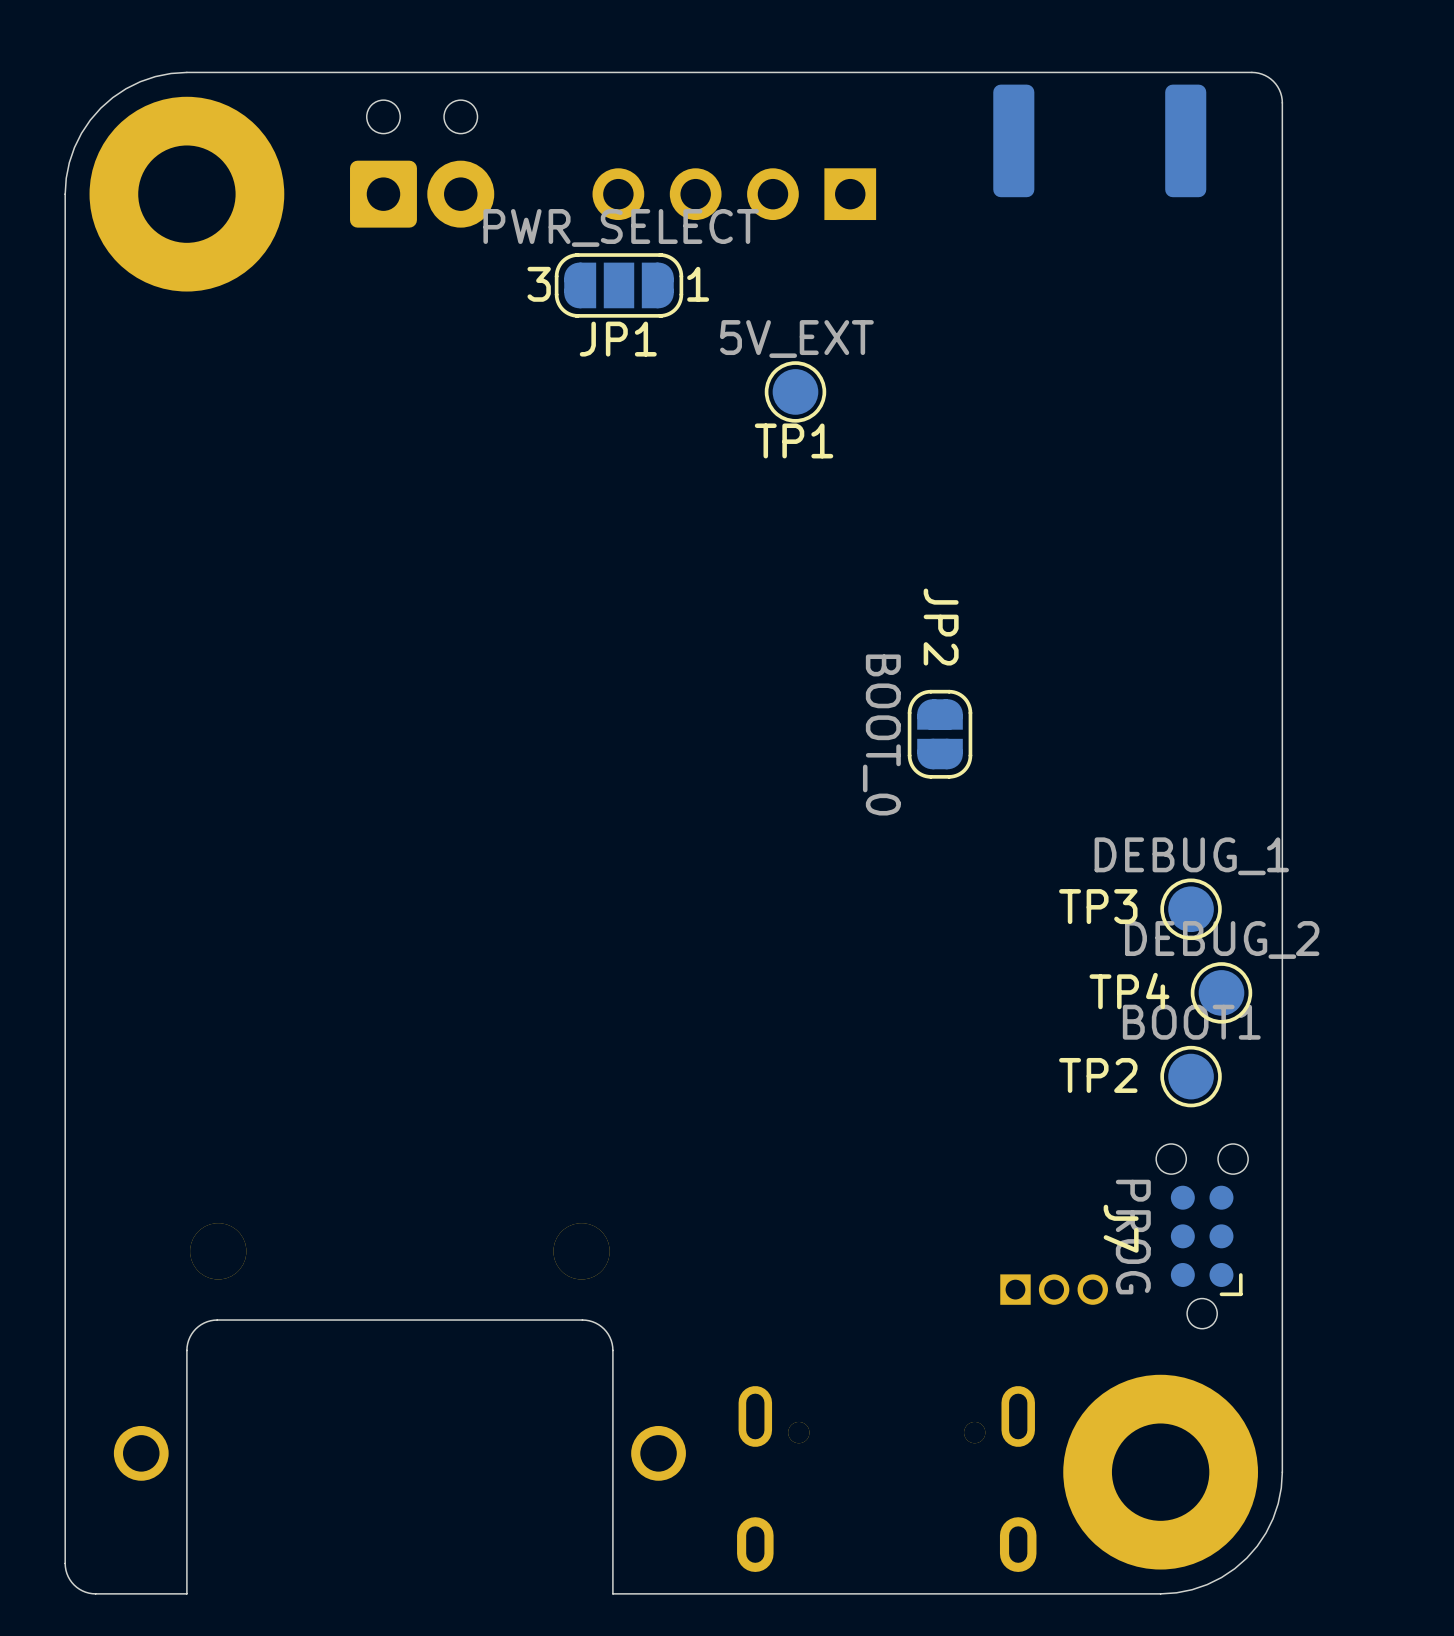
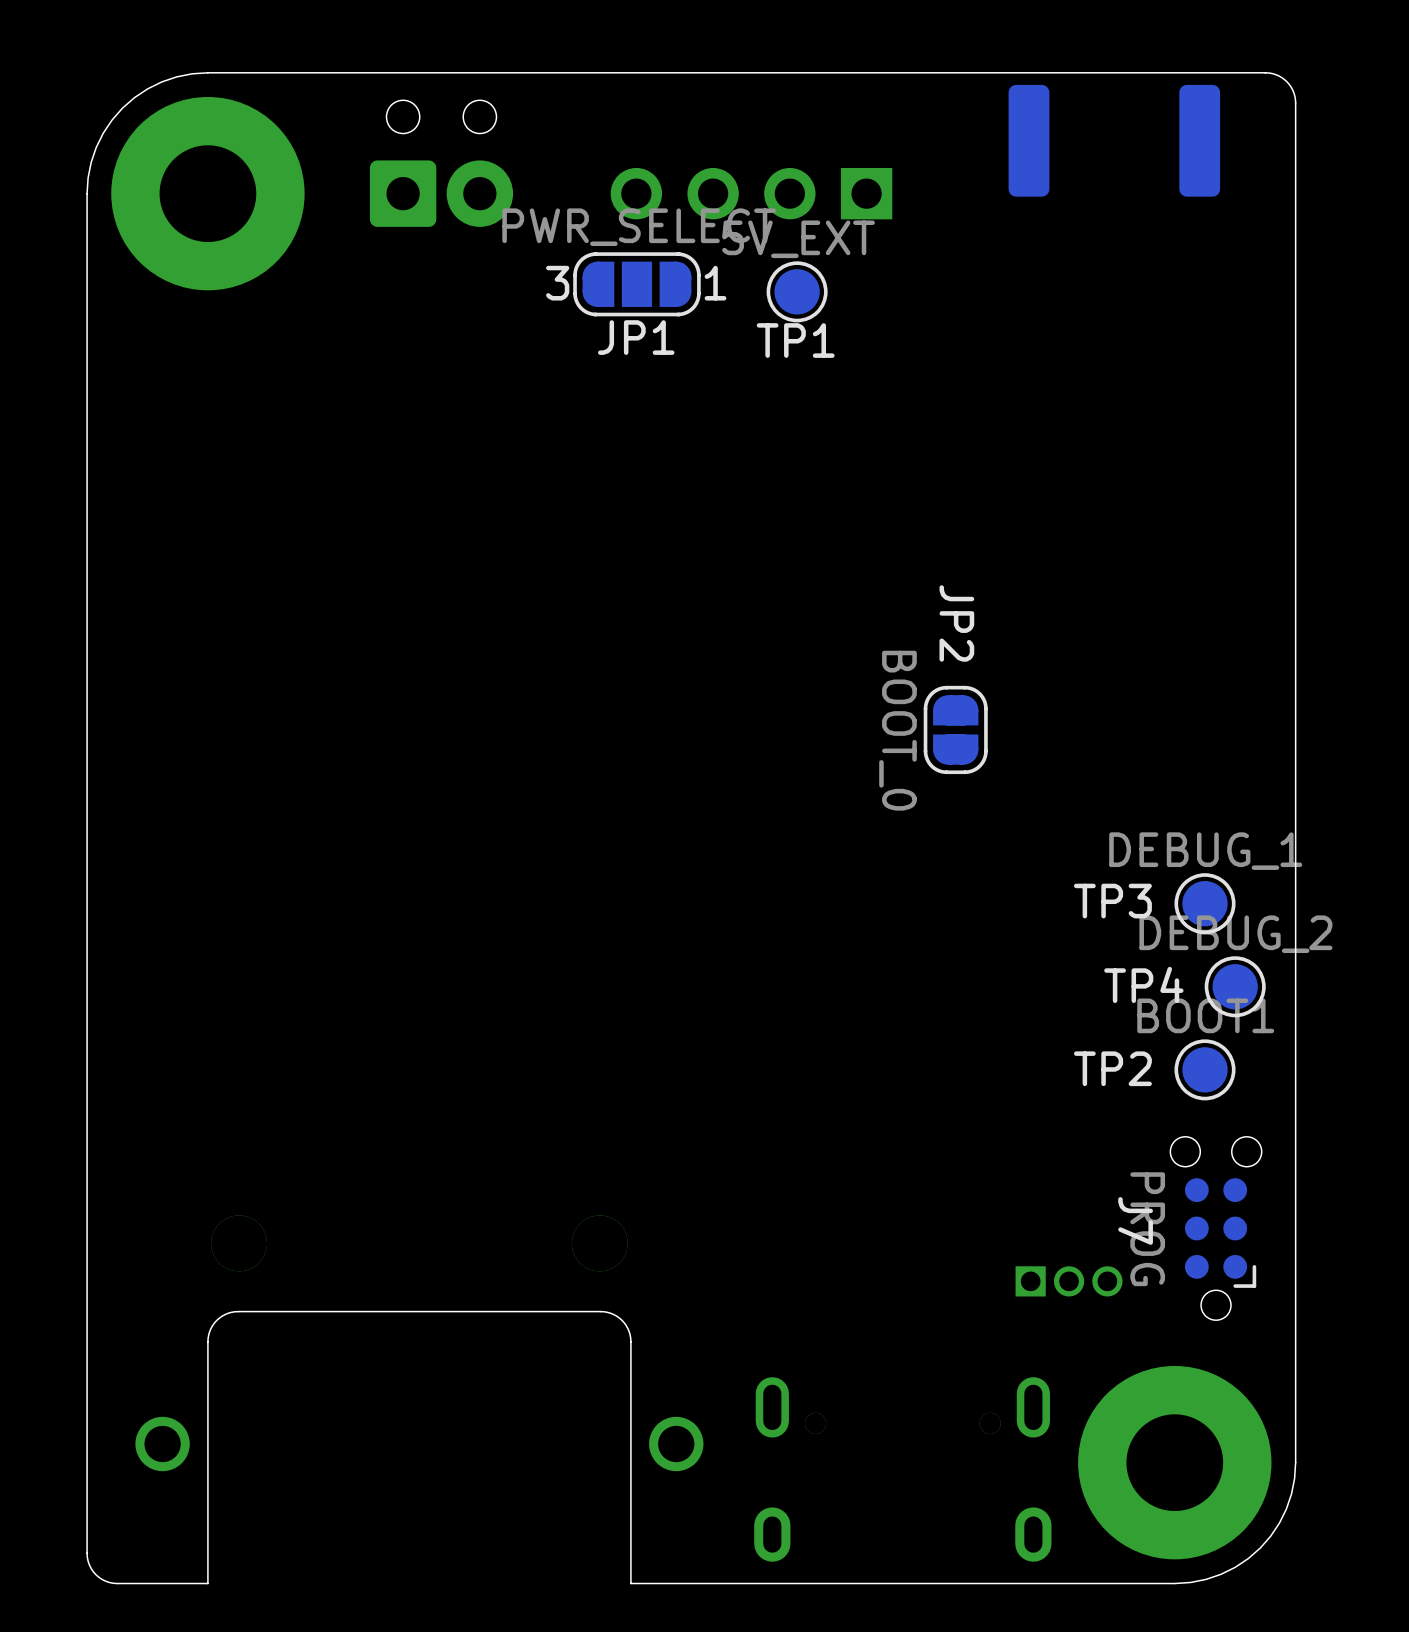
TP1 position: (795, 391) -> (797, 291)

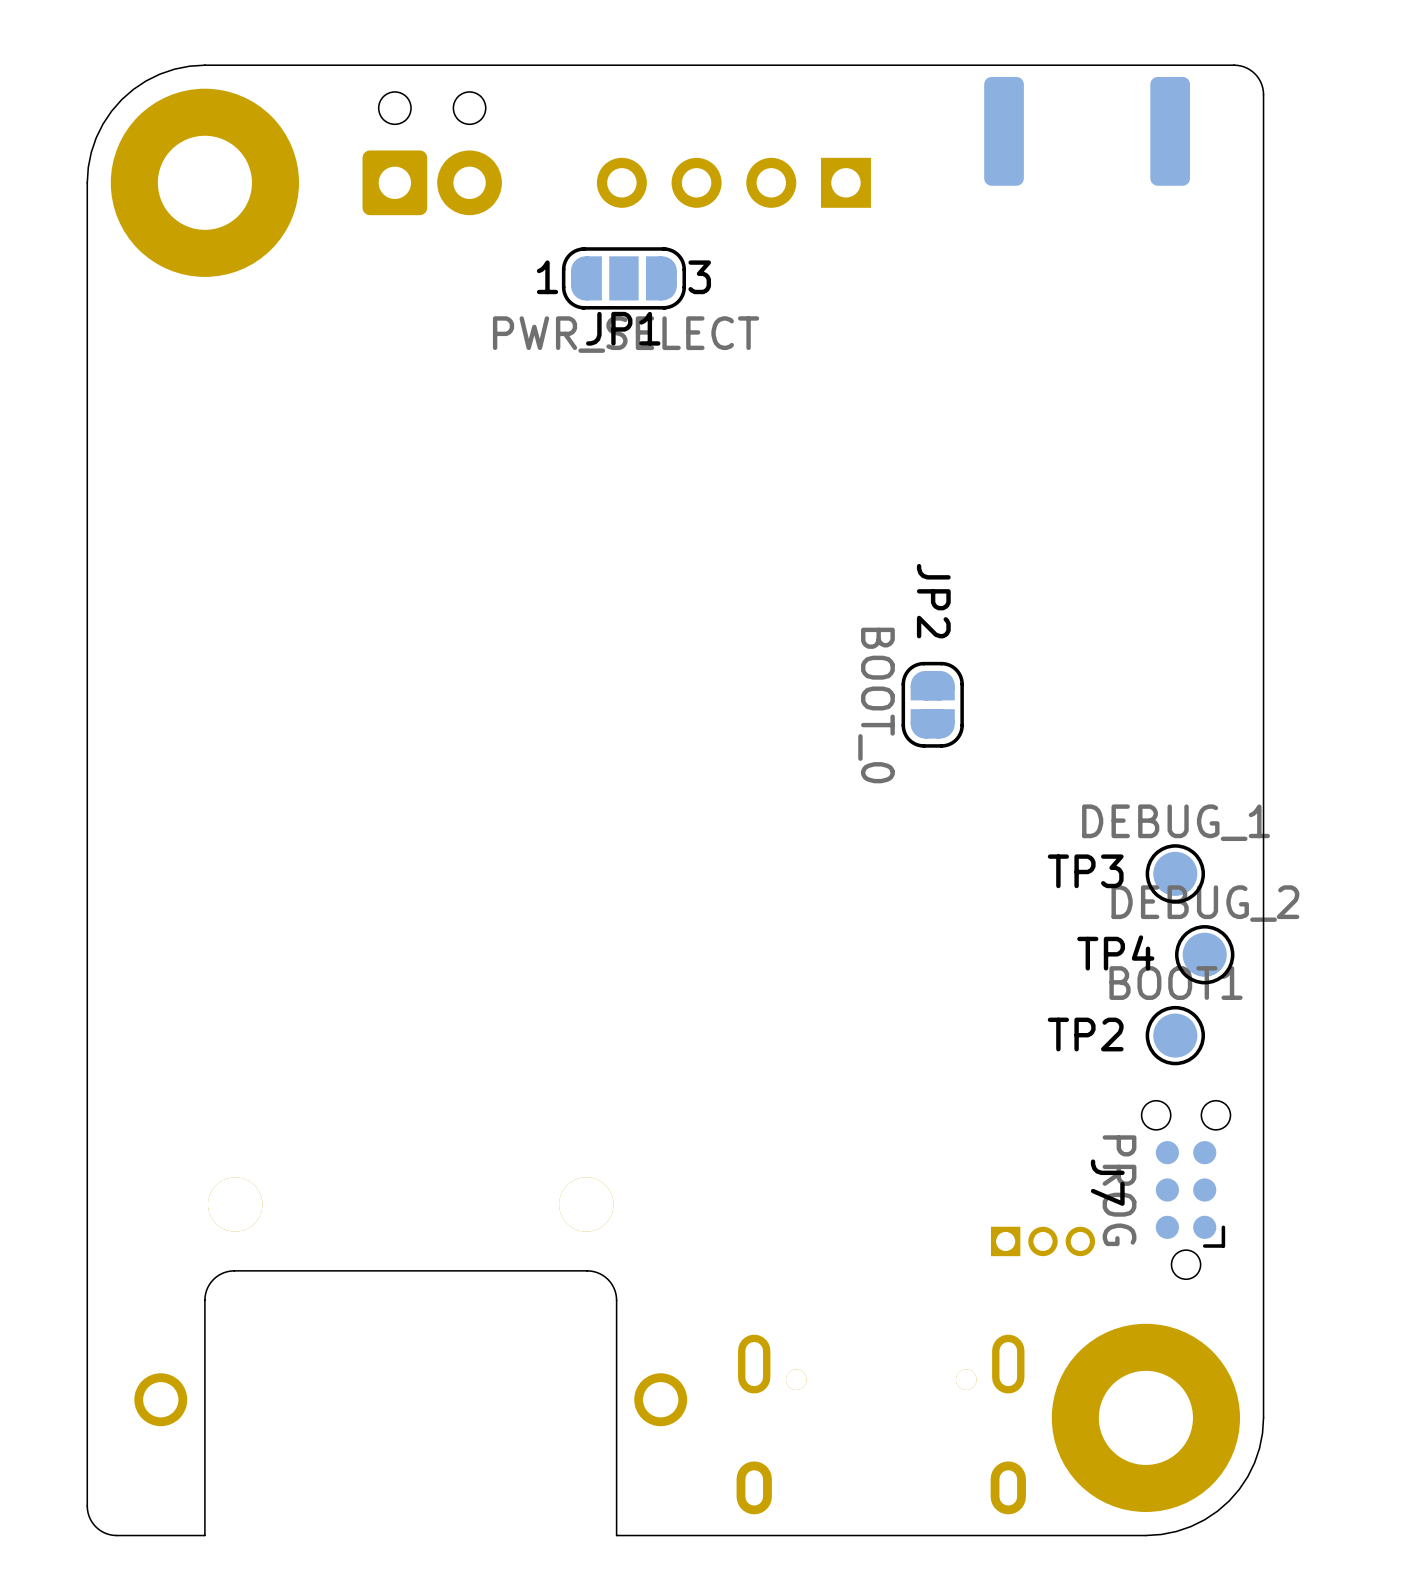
JP1 rotation: 0° (636, 284) -> 180° (623, 278)
TP1: 5V_EXT (797, 291) -> none

